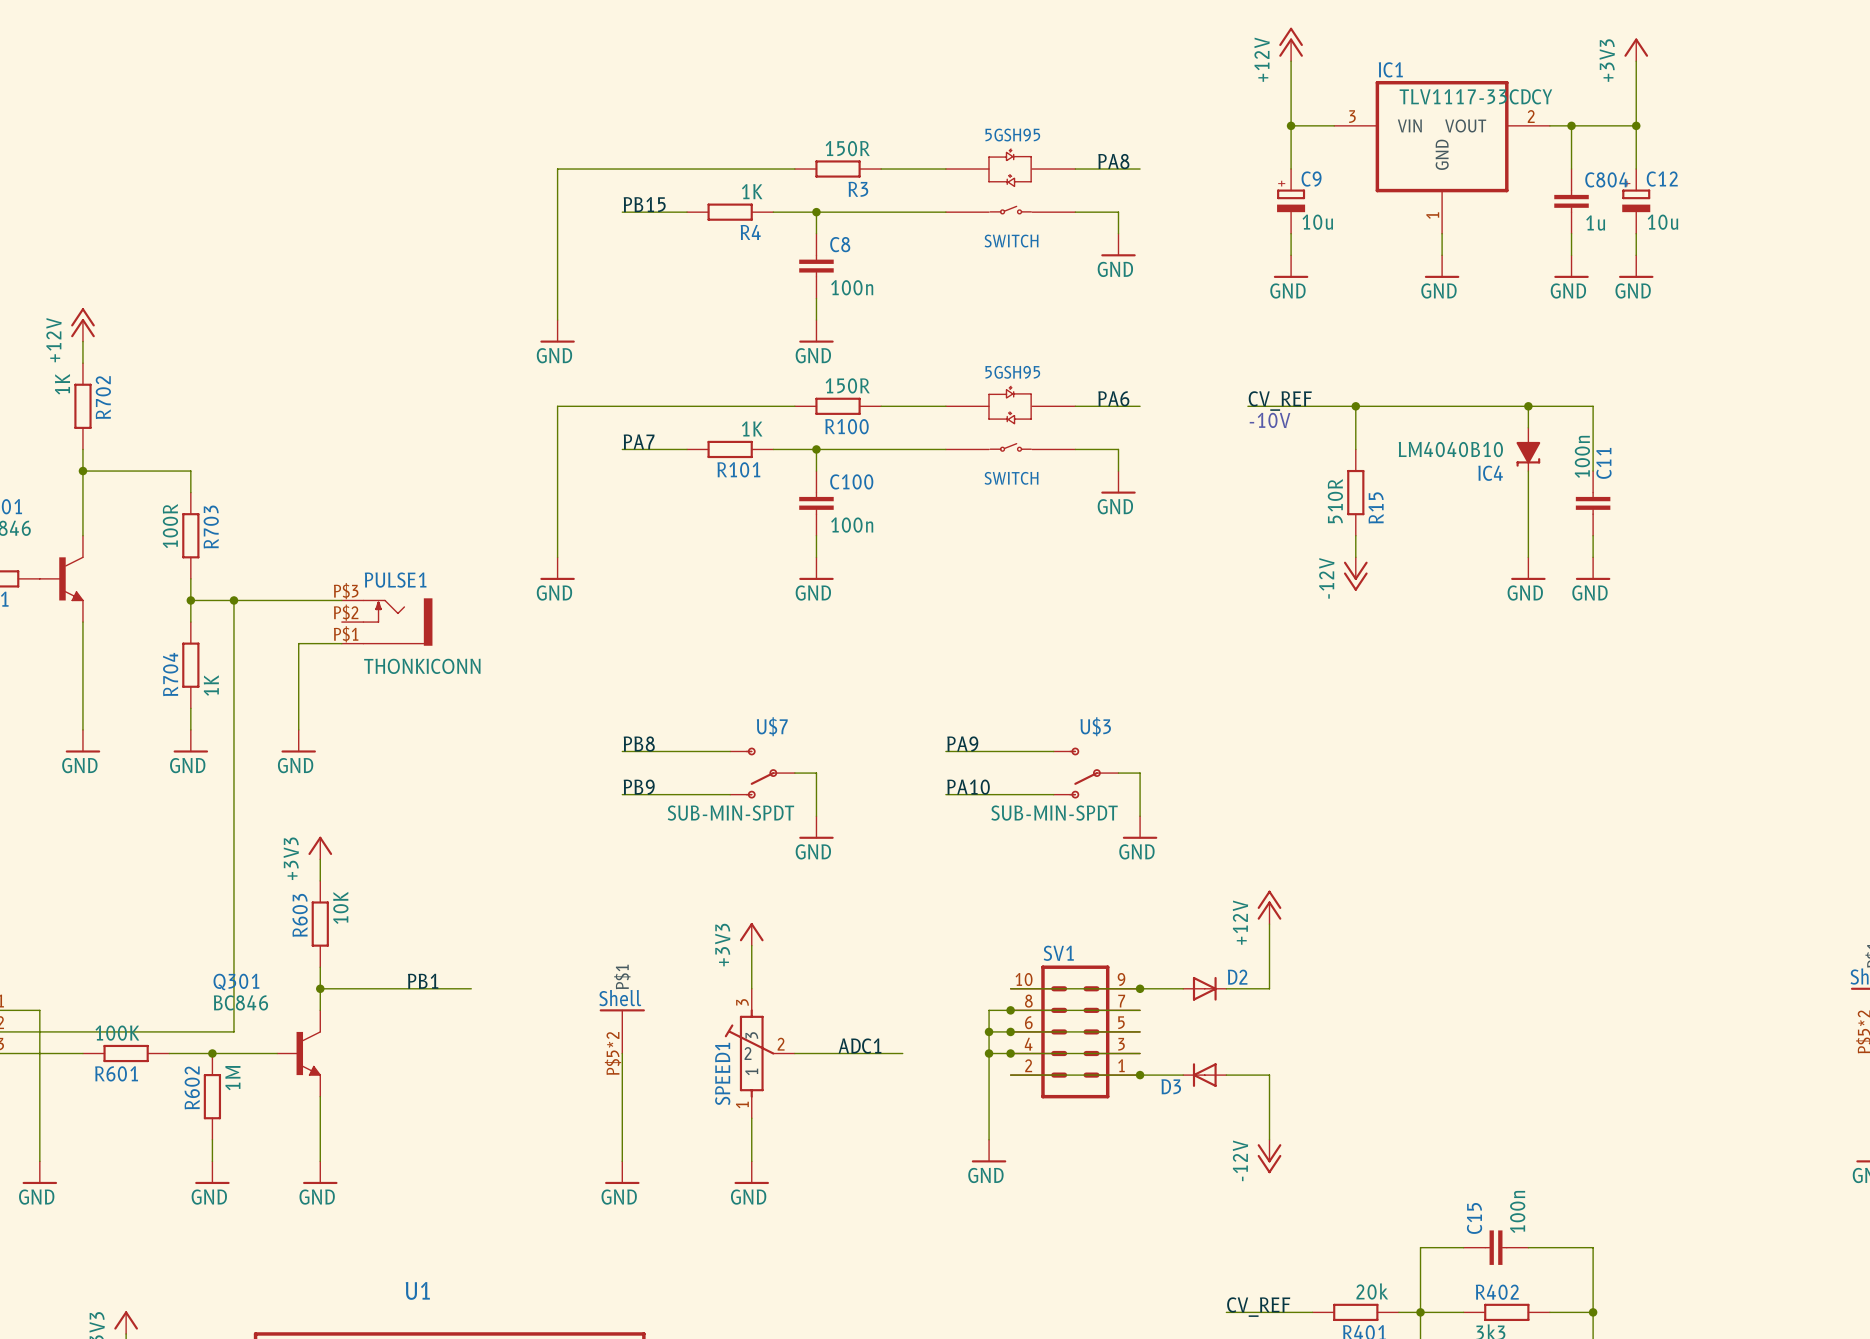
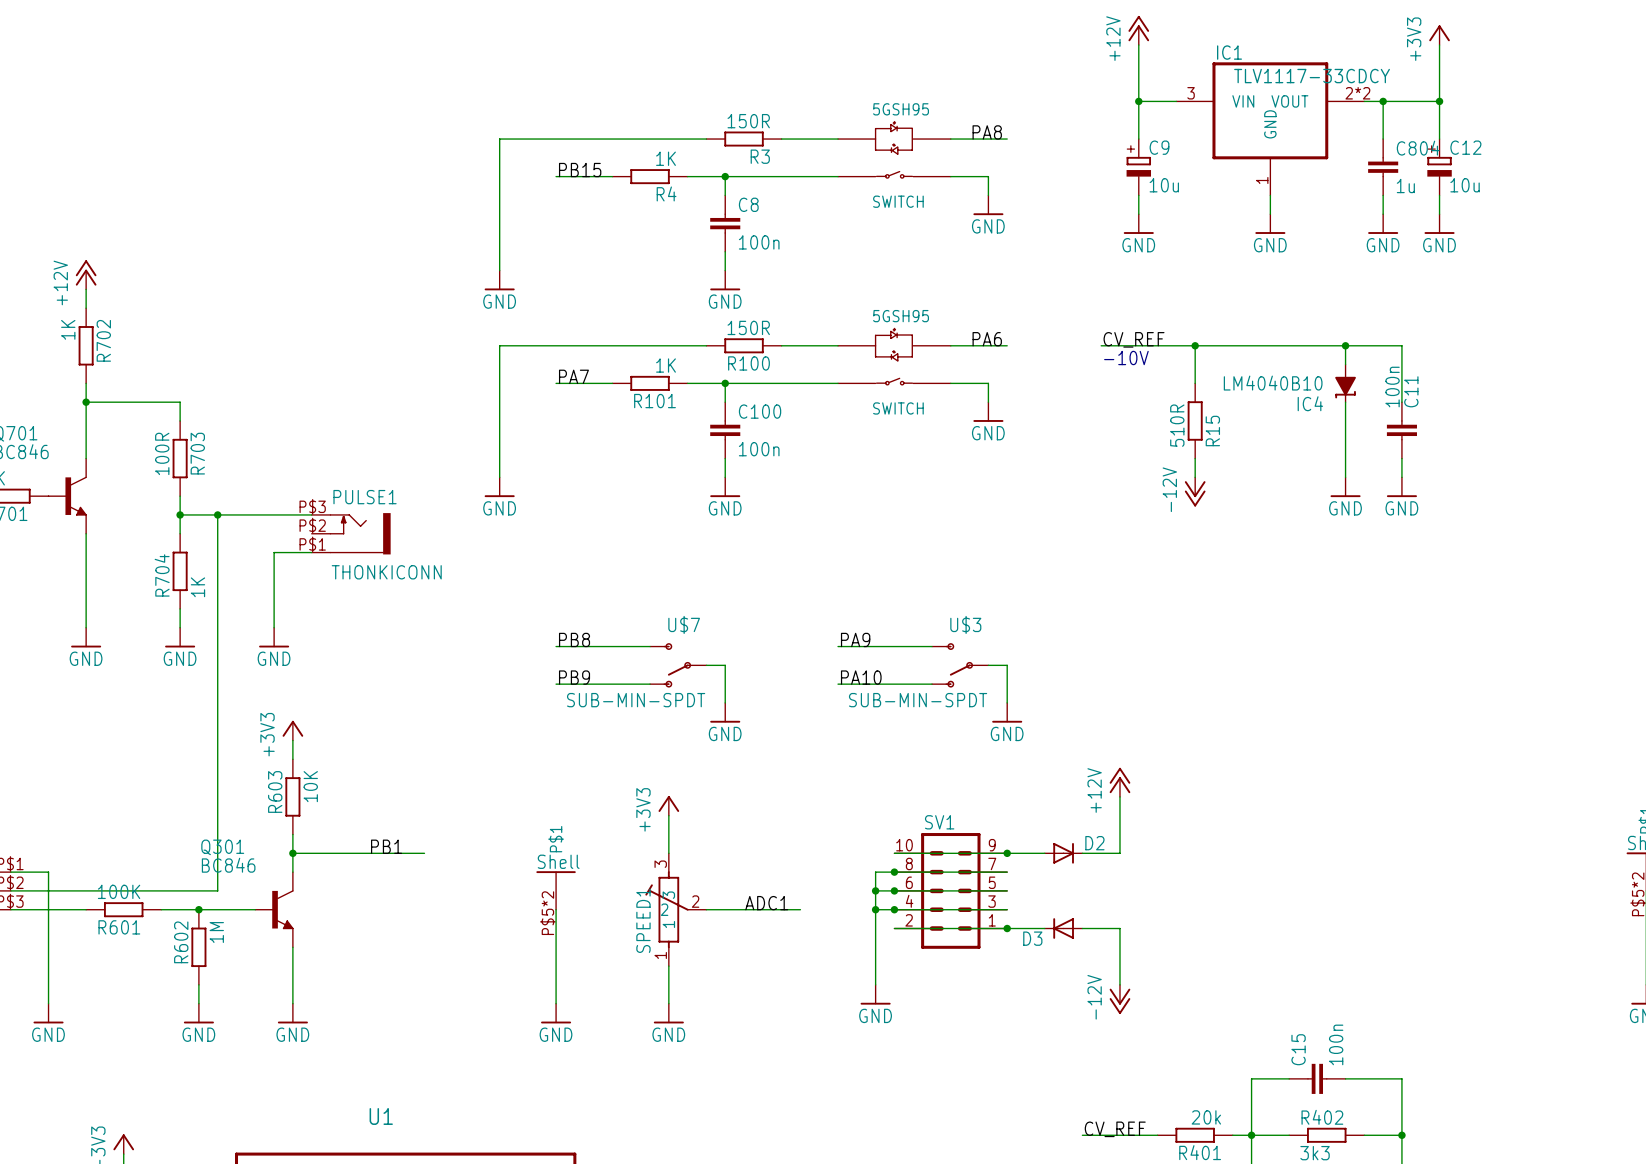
IC1 pin number: 2 (1531, 116) -> 2*2 (1357, 93)

